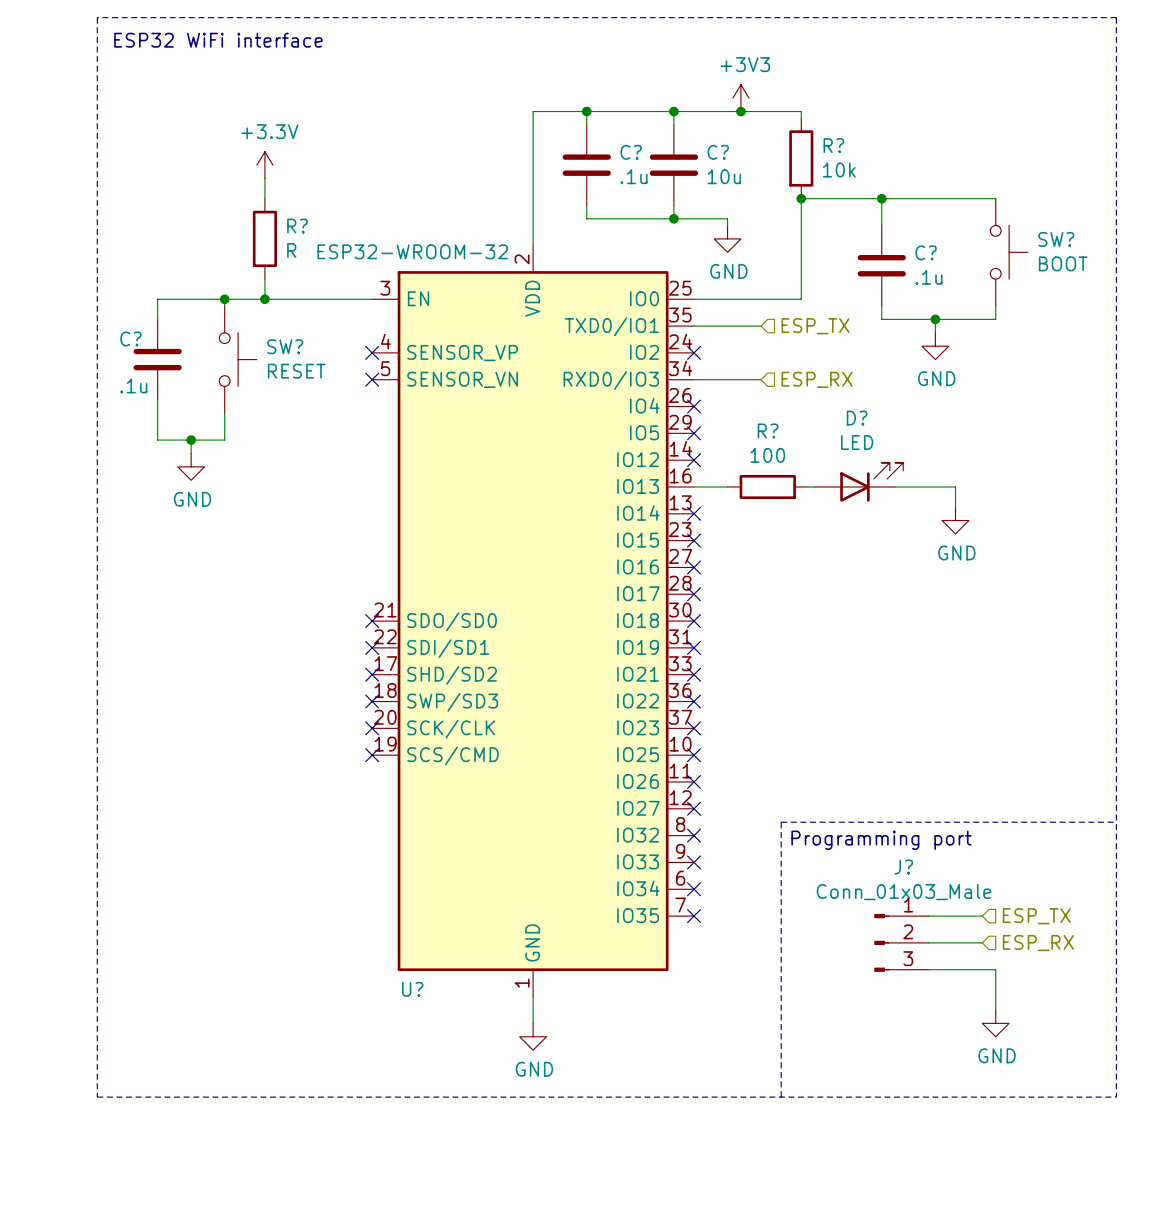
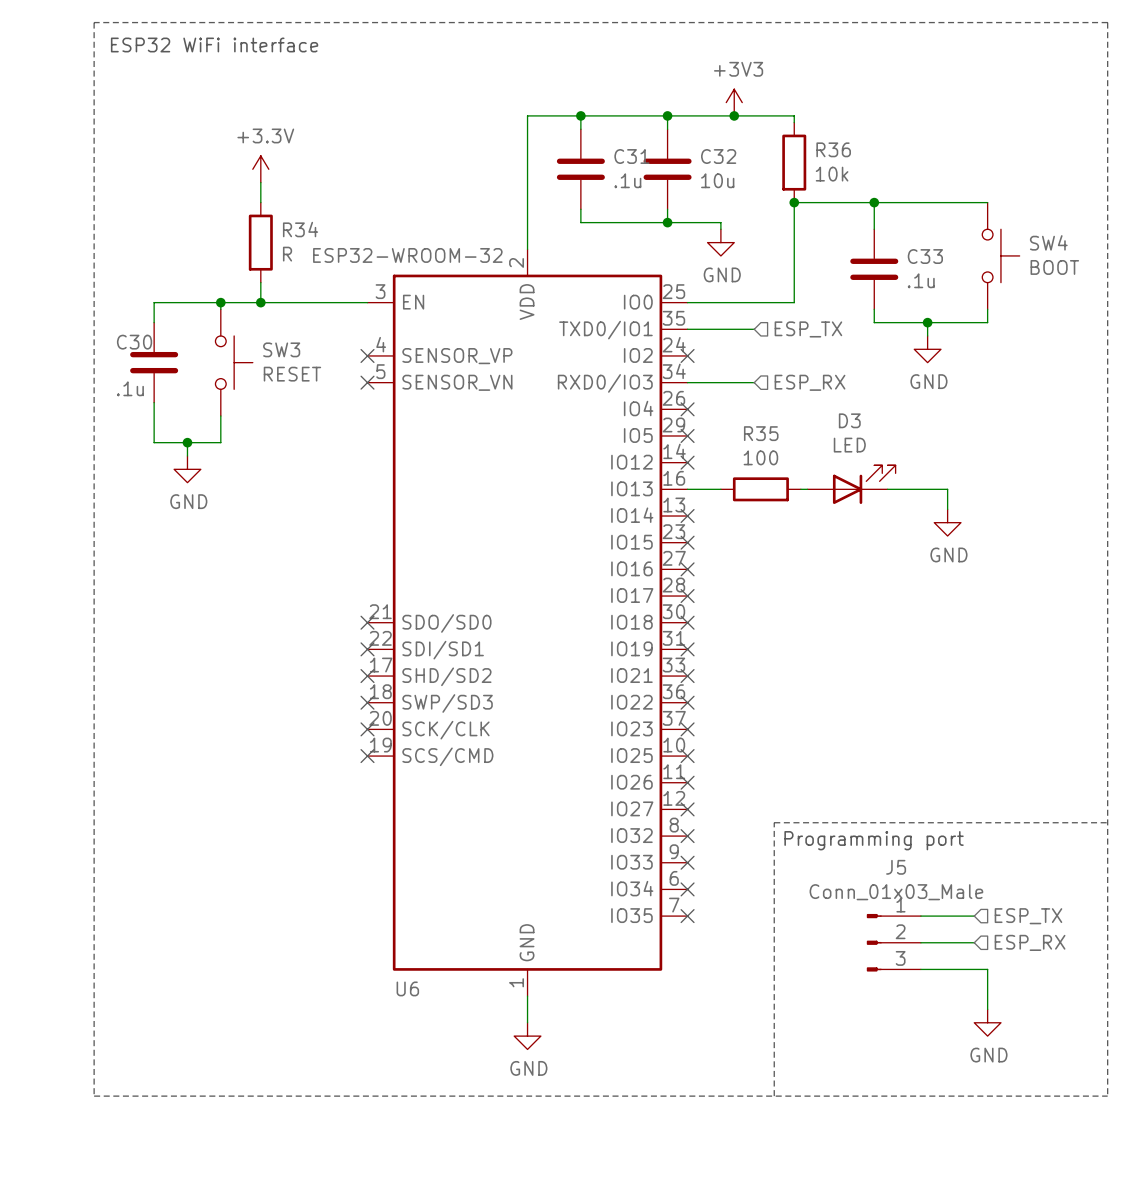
R? name: R? (833, 145) -> R36 (833, 149)
C? name: C? (631, 152) -> C31 (631, 156)
C? name: C? (718, 152) -> C32 (718, 156)
R? name: R? (297, 226) -> R34 (300, 229)
SW? name: SW? (1056, 239) -> SW4 (1048, 242)
C? name: C? (926, 252) -> C33 (925, 256)
C? name: C? (130, 338) -> C30 (134, 342)
SW? name: SW? (285, 346) -> SW3 (281, 349)
D? name: D? (857, 418) -> D3 (849, 420)
R? name: R? (768, 430) -> R35 (761, 433)
J? name: J? (903, 867) -> J5 (896, 867)
U? name: U? (412, 989) -> U6 (407, 988)

